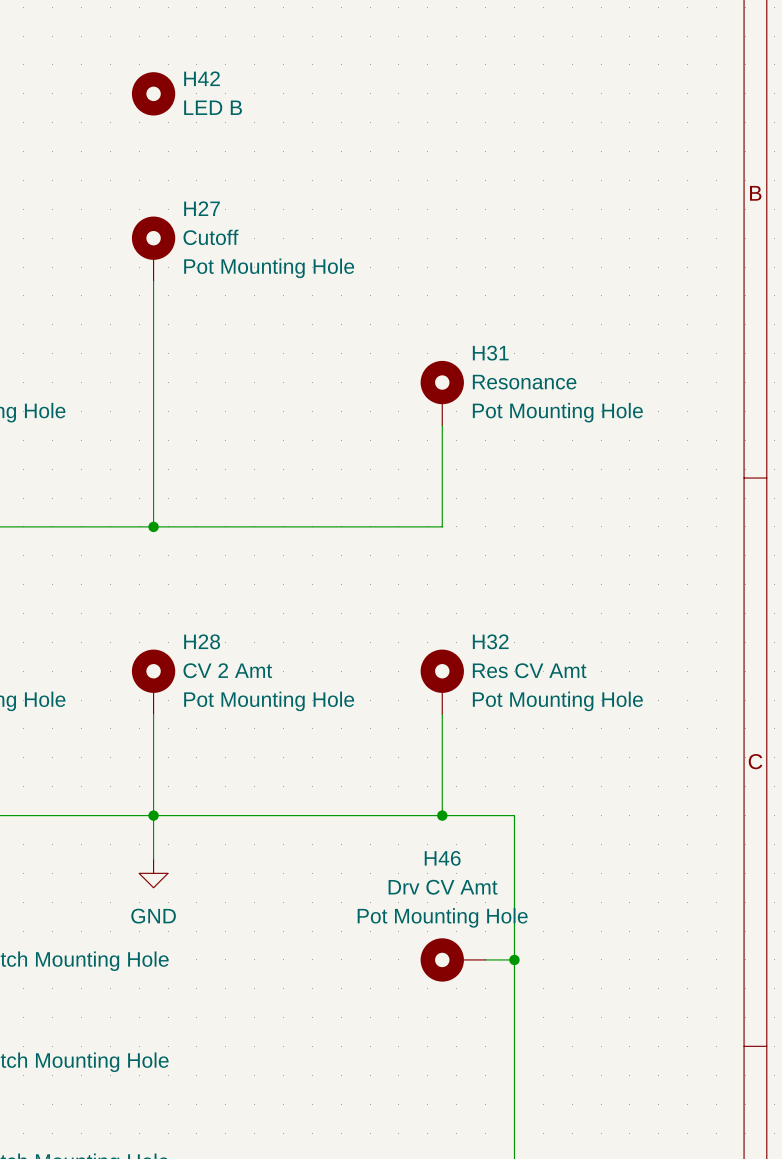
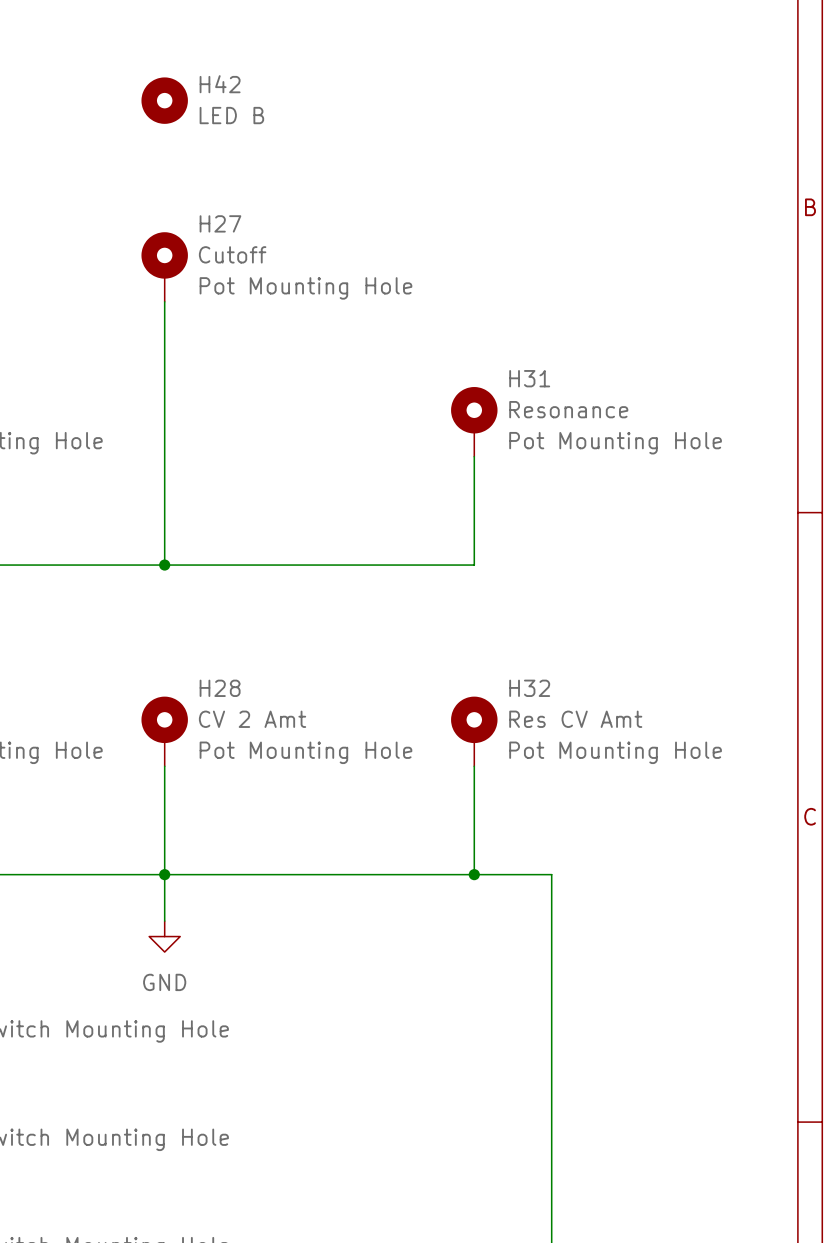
H46: Drv CV Amt (453, 959) -> none
wire: (485, 959) (514, 959) -> none
junction: (514, 959) -> none

